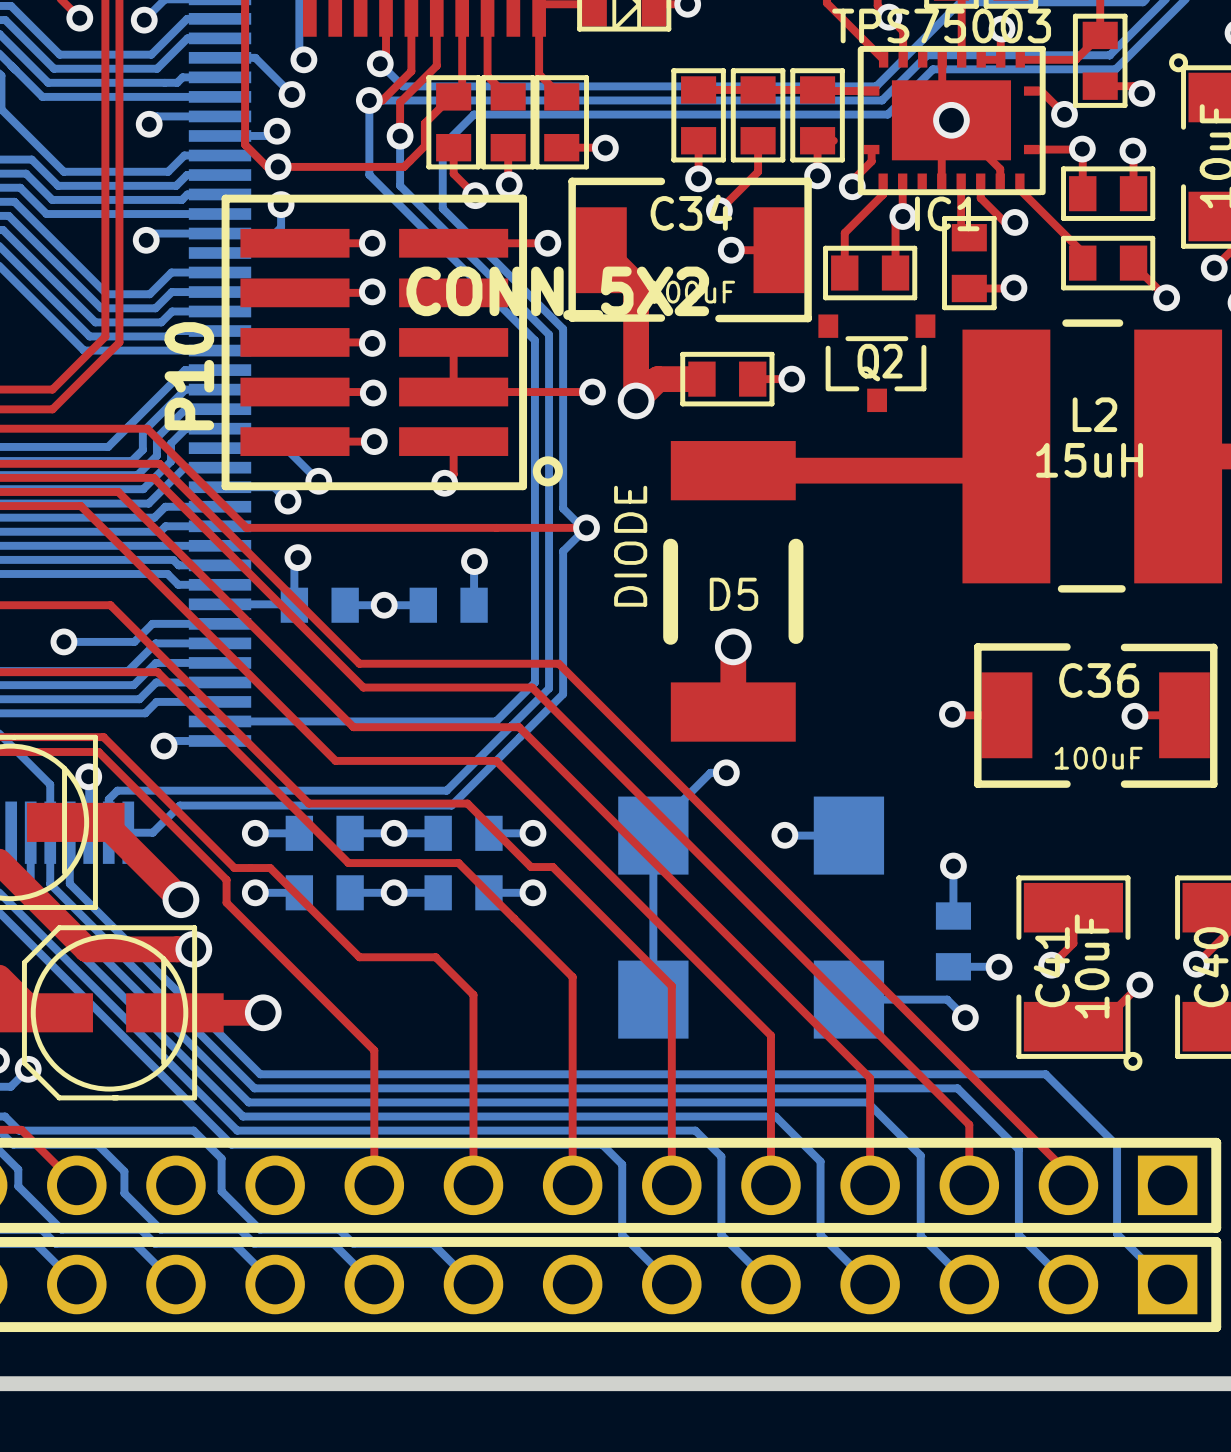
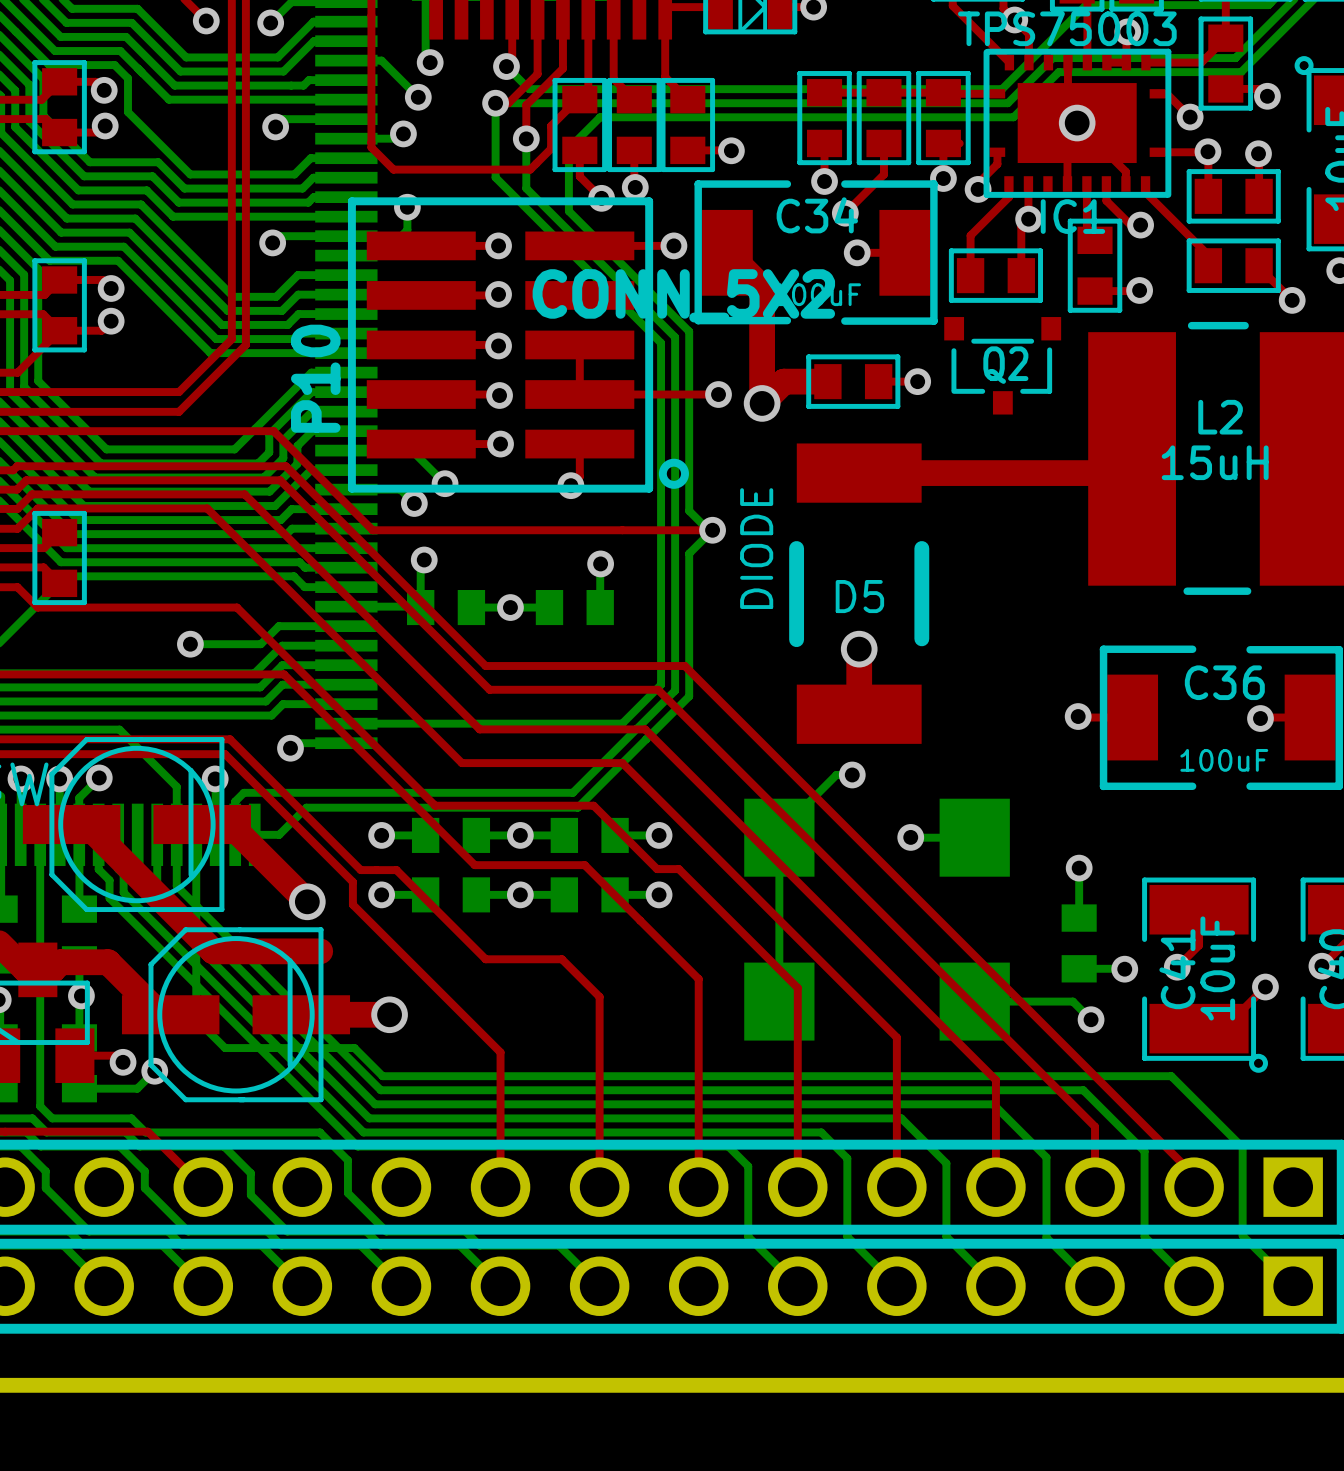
via: (278, 166) -> none
bottom track: (69, 883) (260, 1074) -> (196, 885) (196, 1019) (225, 1048) (354, 1048) (382, 1076) (386, 1076)
via: (193, 949) -> none

